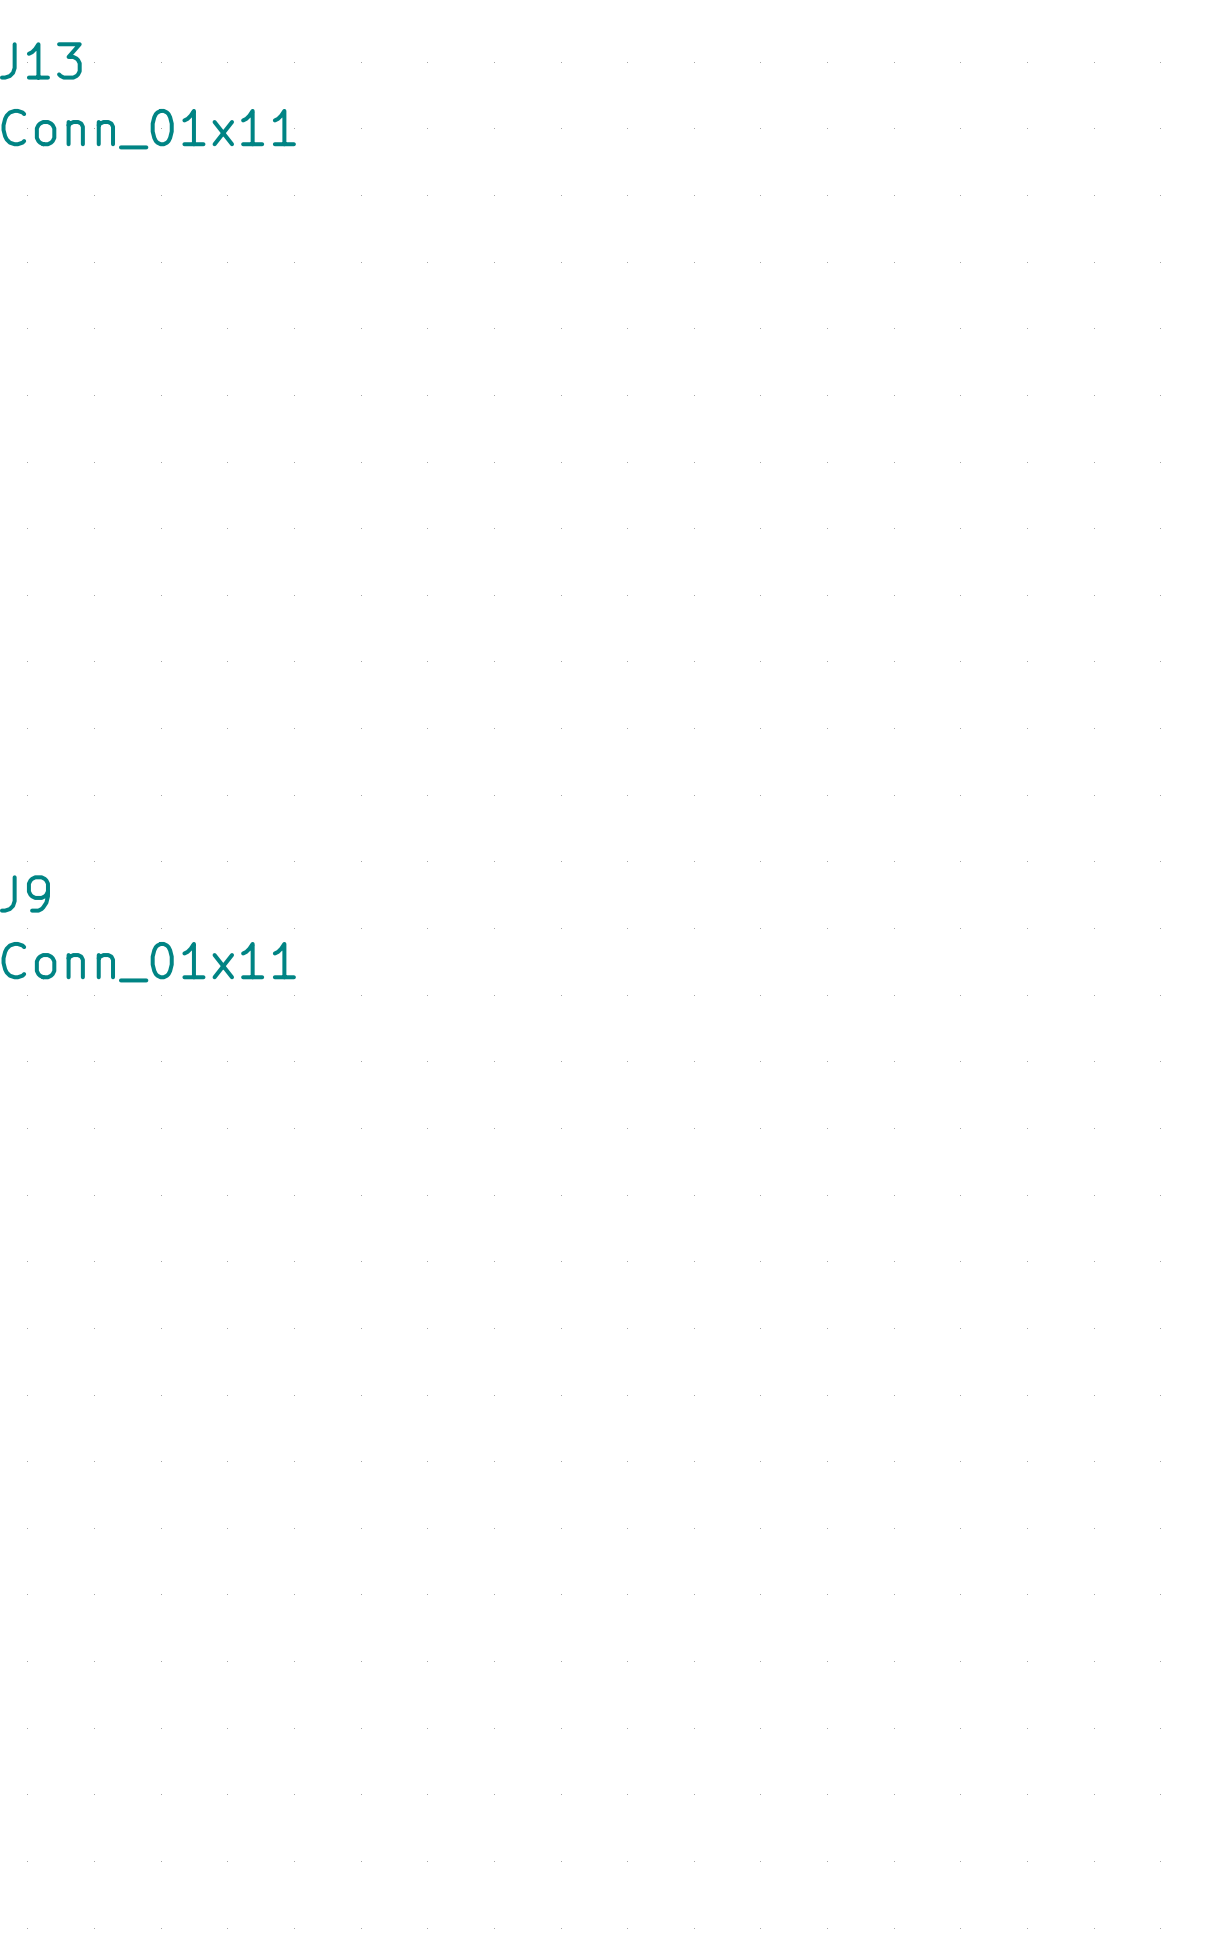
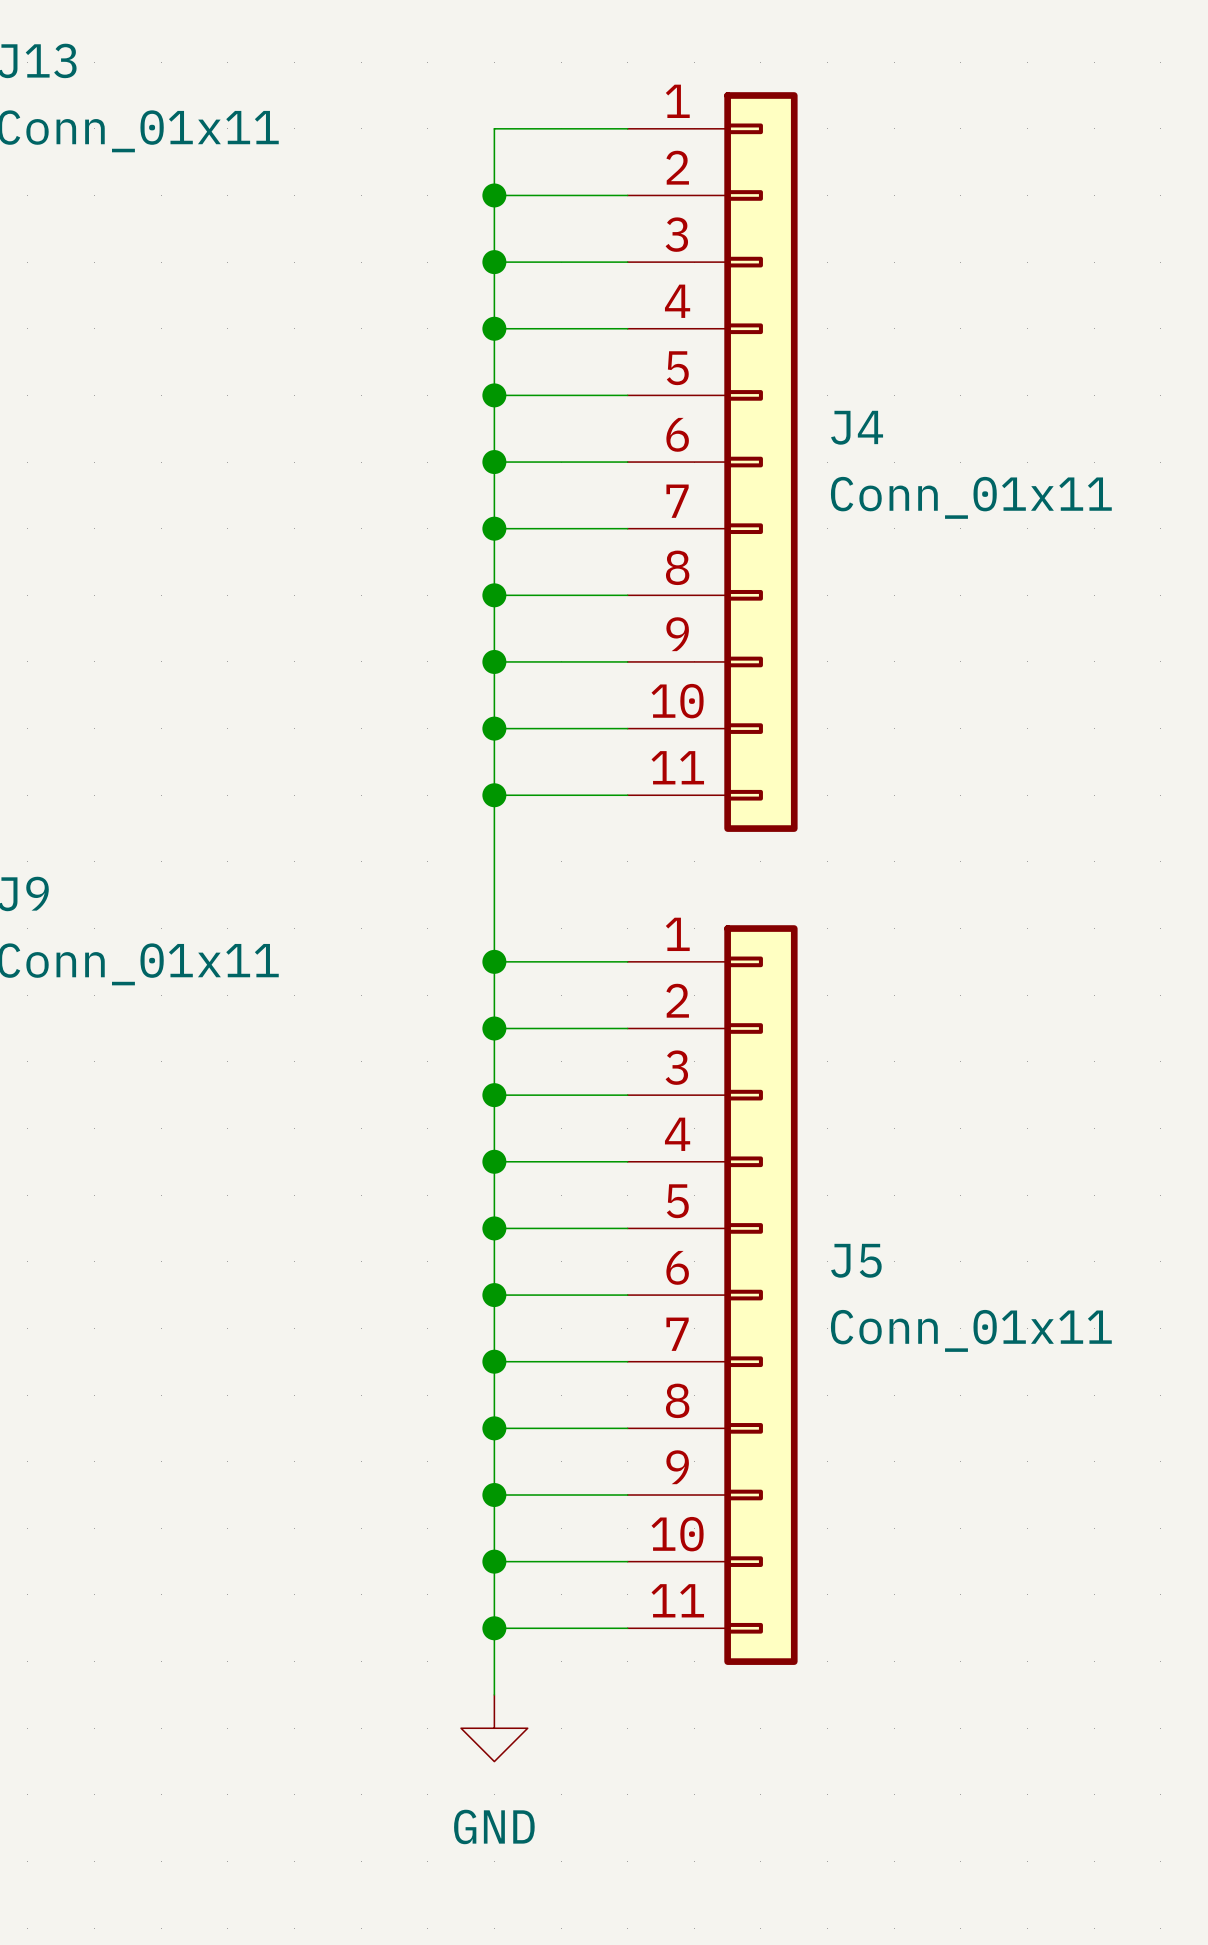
wire: none -> (627, 128) (494, 128) (494, 1694)
wire: none -> (494, 195) (627, 195)
junction: none -> (494, 195)
wire: none -> (494, 262) (627, 262)
junction: none -> (494, 262)
wire: none -> (494, 328) (627, 328)
junction: none -> (494, 328)
wire: none -> (494, 395) (627, 395)
junction: none -> (494, 395)
wire: none -> (494, 462) (627, 462)
junction: none -> (494, 462)
J4: none -> Conn_01x11 (712, 462)
wire: none -> (494, 528) (627, 528)
junction: none -> (494, 528)
wire: none -> (494, 595) (627, 595)
junction: none -> (494, 595)
wire: none -> (494, 661) (627, 661)
junction: none -> (494, 661)
wire: none -> (494, 728) (627, 728)
junction: none -> (494, 728)
wire: none -> (494, 795) (627, 795)
junction: none -> (494, 795)
wire: none -> (494, 961) (627, 961)
junction: none -> (494, 961)
wire: none -> (494, 1028) (627, 1028)
junction: none -> (494, 1028)
wire: none -> (494, 1095) (627, 1095)
junction: none -> (494, 1095)
wire: none -> (494, 1161) (627, 1161)
junction: none -> (494, 1161)
wire: none -> (494, 1228) (627, 1228)
junction: none -> (494, 1228)
wire: none -> (494, 1295) (627, 1295)
junction: none -> (494, 1295)
J5: none -> Conn_01x11 (712, 1295)
wire: none -> (494, 1361) (627, 1361)
junction: none -> (494, 1361)
wire: none -> (494, 1428) (627, 1428)
junction: none -> (494, 1428)
wire: none -> (494, 1495) (627, 1495)
junction: none -> (494, 1495)
wire: none -> (494, 1561) (627, 1561)
junction: none -> (494, 1561)
wire: none -> (494, 1628) (627, 1628)
junction: none -> (494, 1628)
power symbol: none -> GND (494, 1728)

